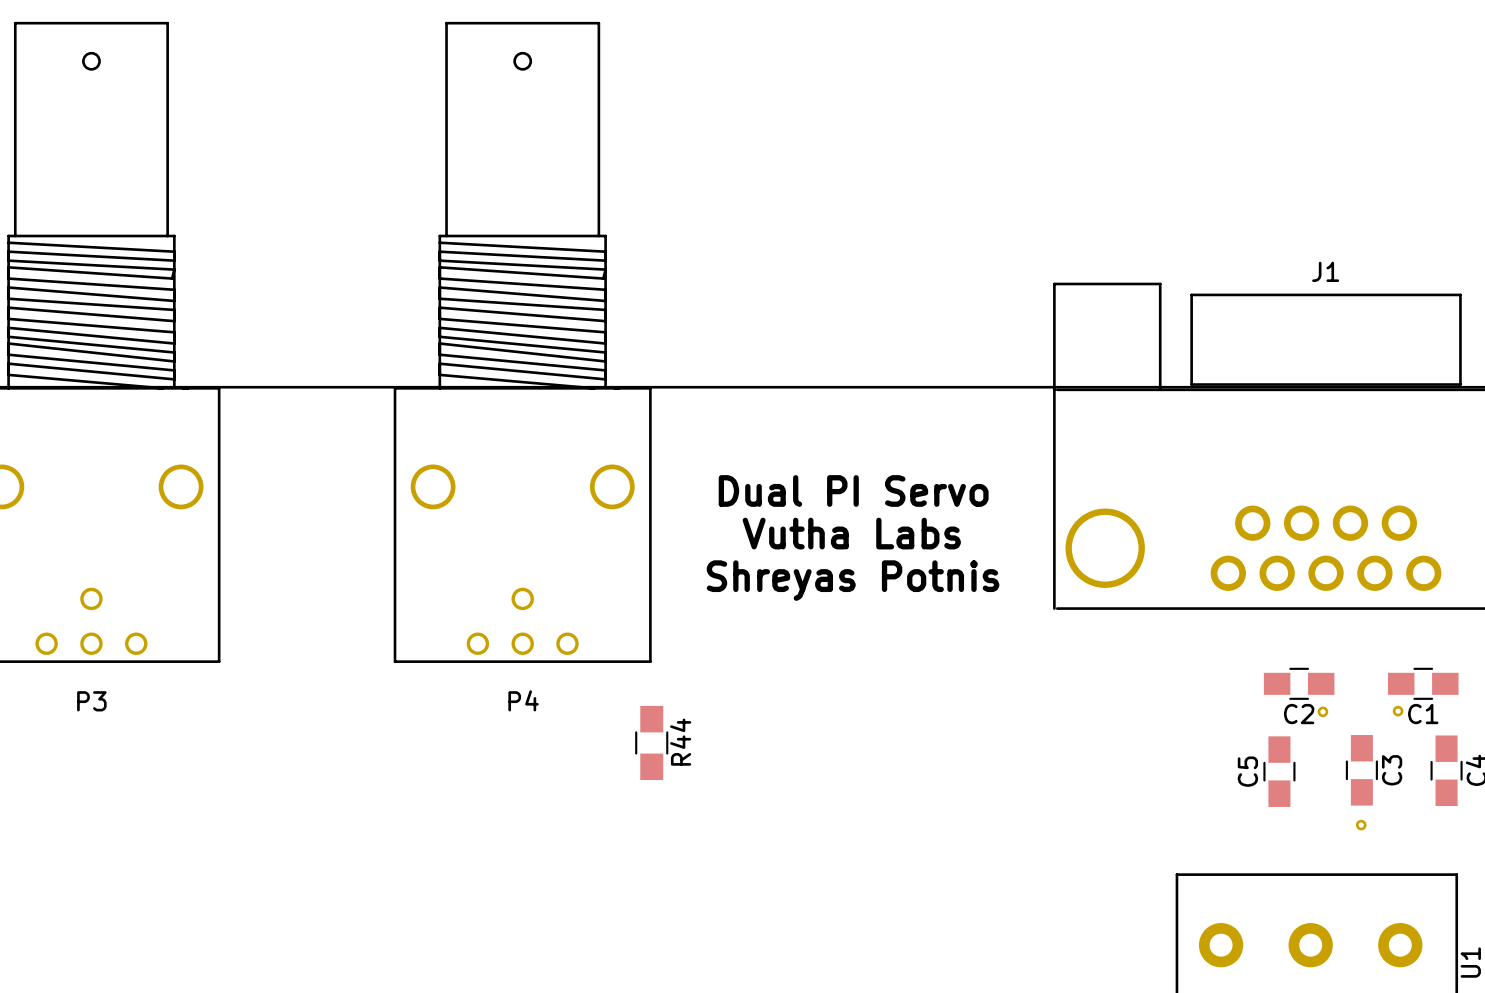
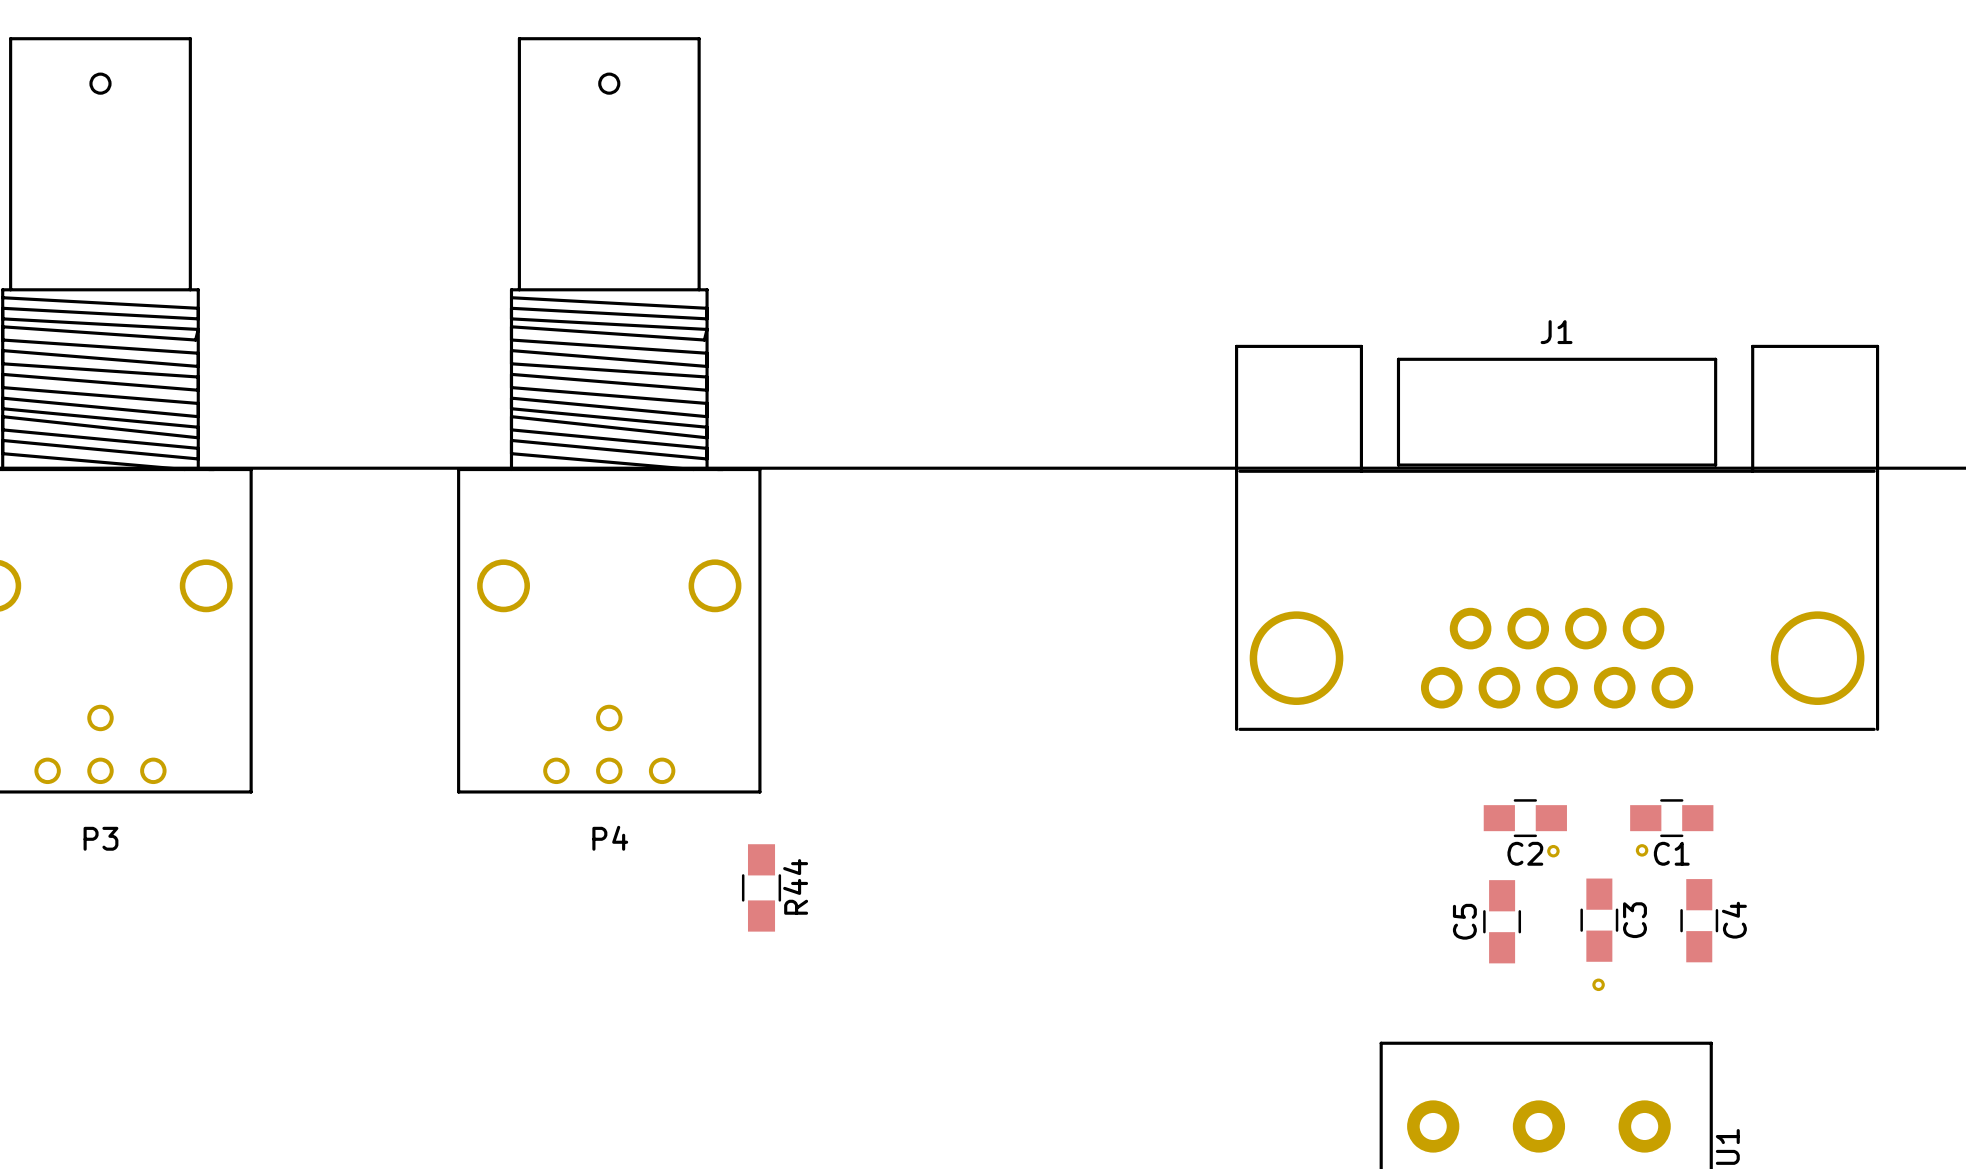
text: Dual PI Servo (853, 490) -> none
text: Vutha Labs (851, 533) -> none
text: Shreyas Potnis (853, 580) -> none

